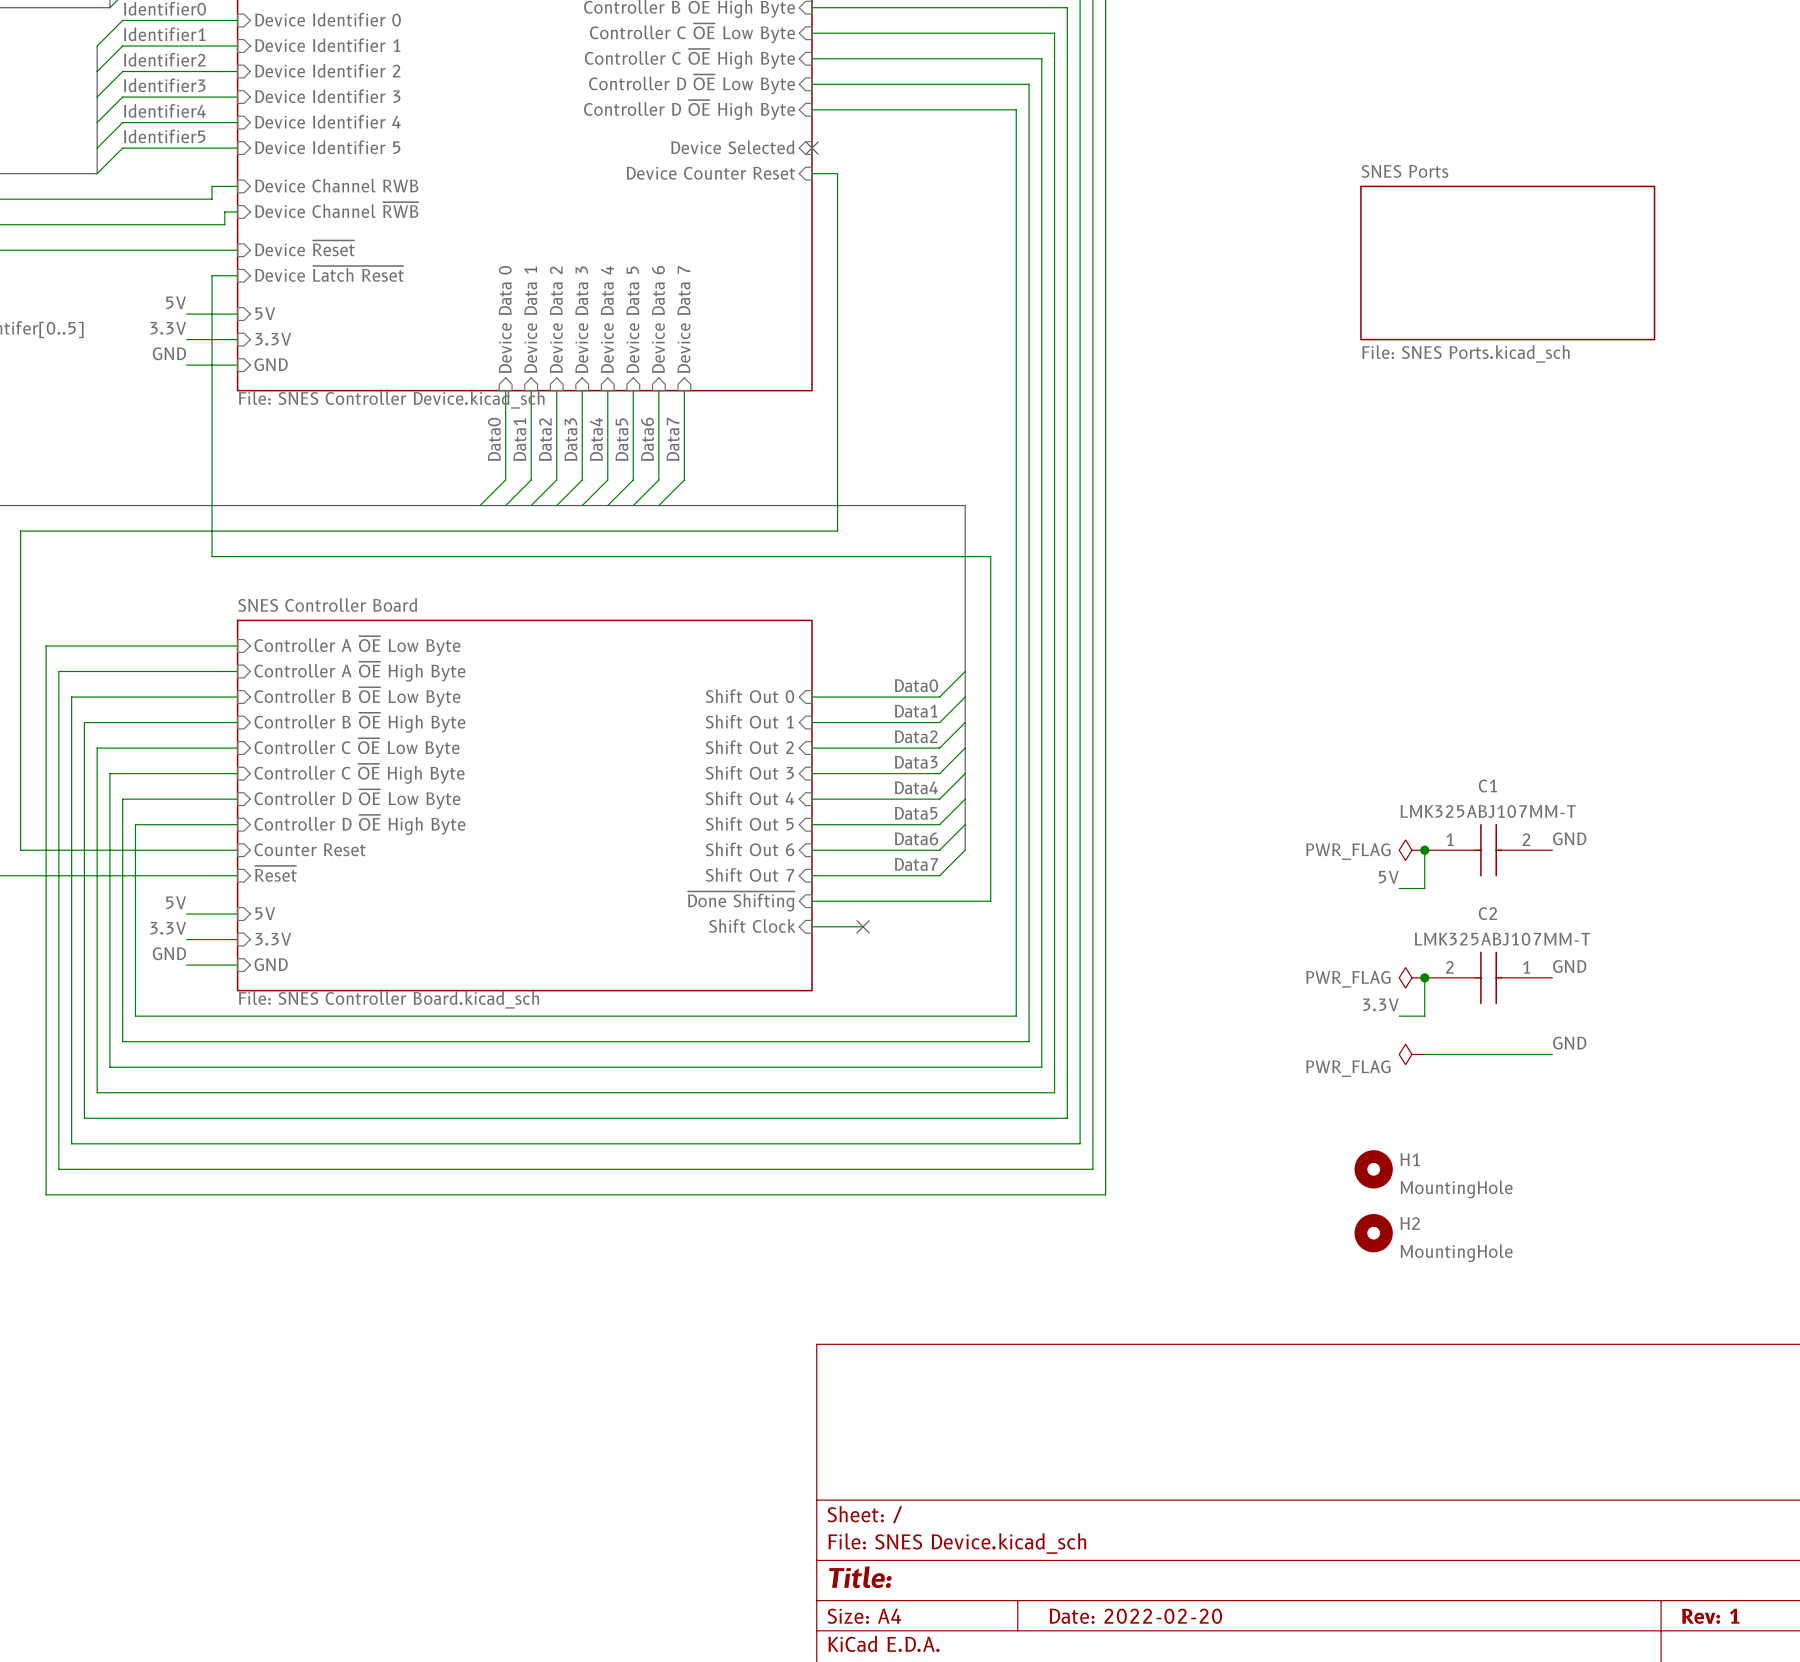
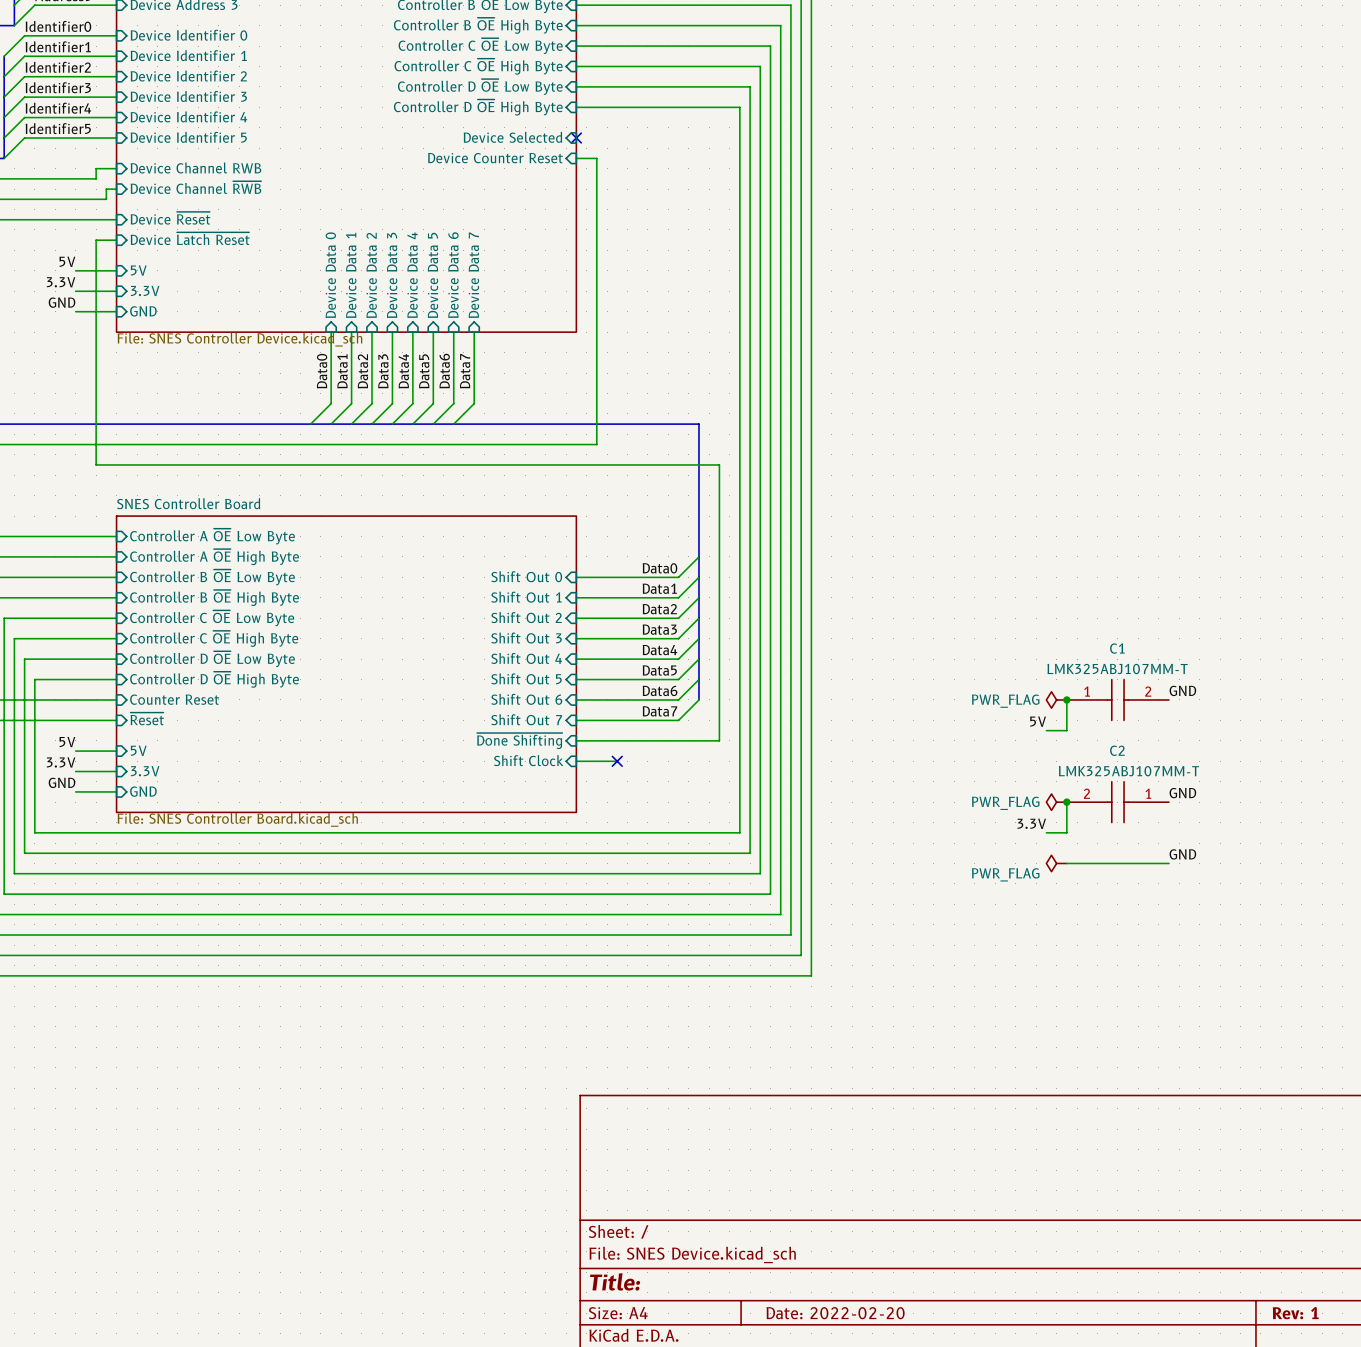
sheet SNES Ports: File: SNES Ports.kicad_sch (1507, 263) -> none
H1: MountingHole (1373, 1169) -> none
H2: MountingHole (1373, 1233) -> none

